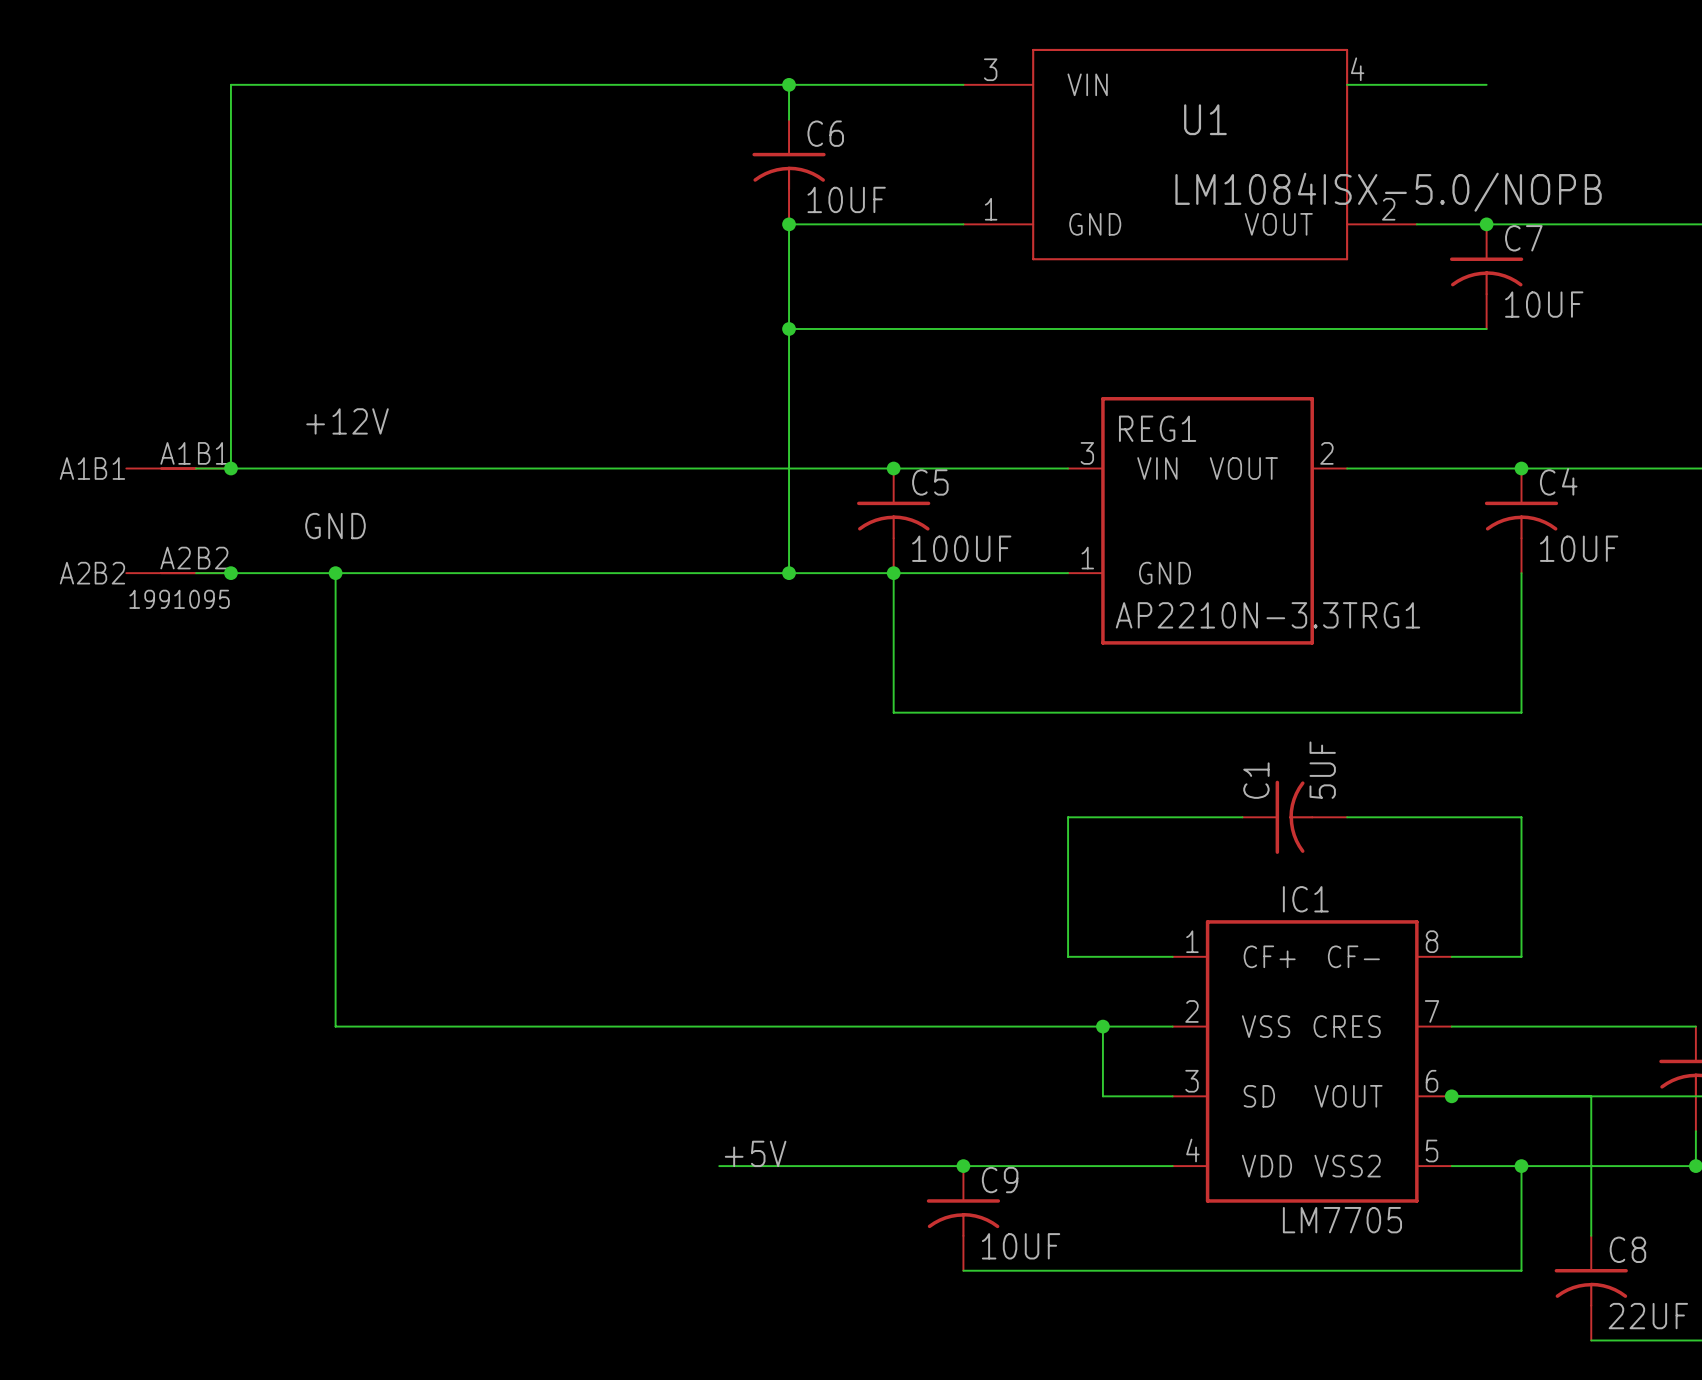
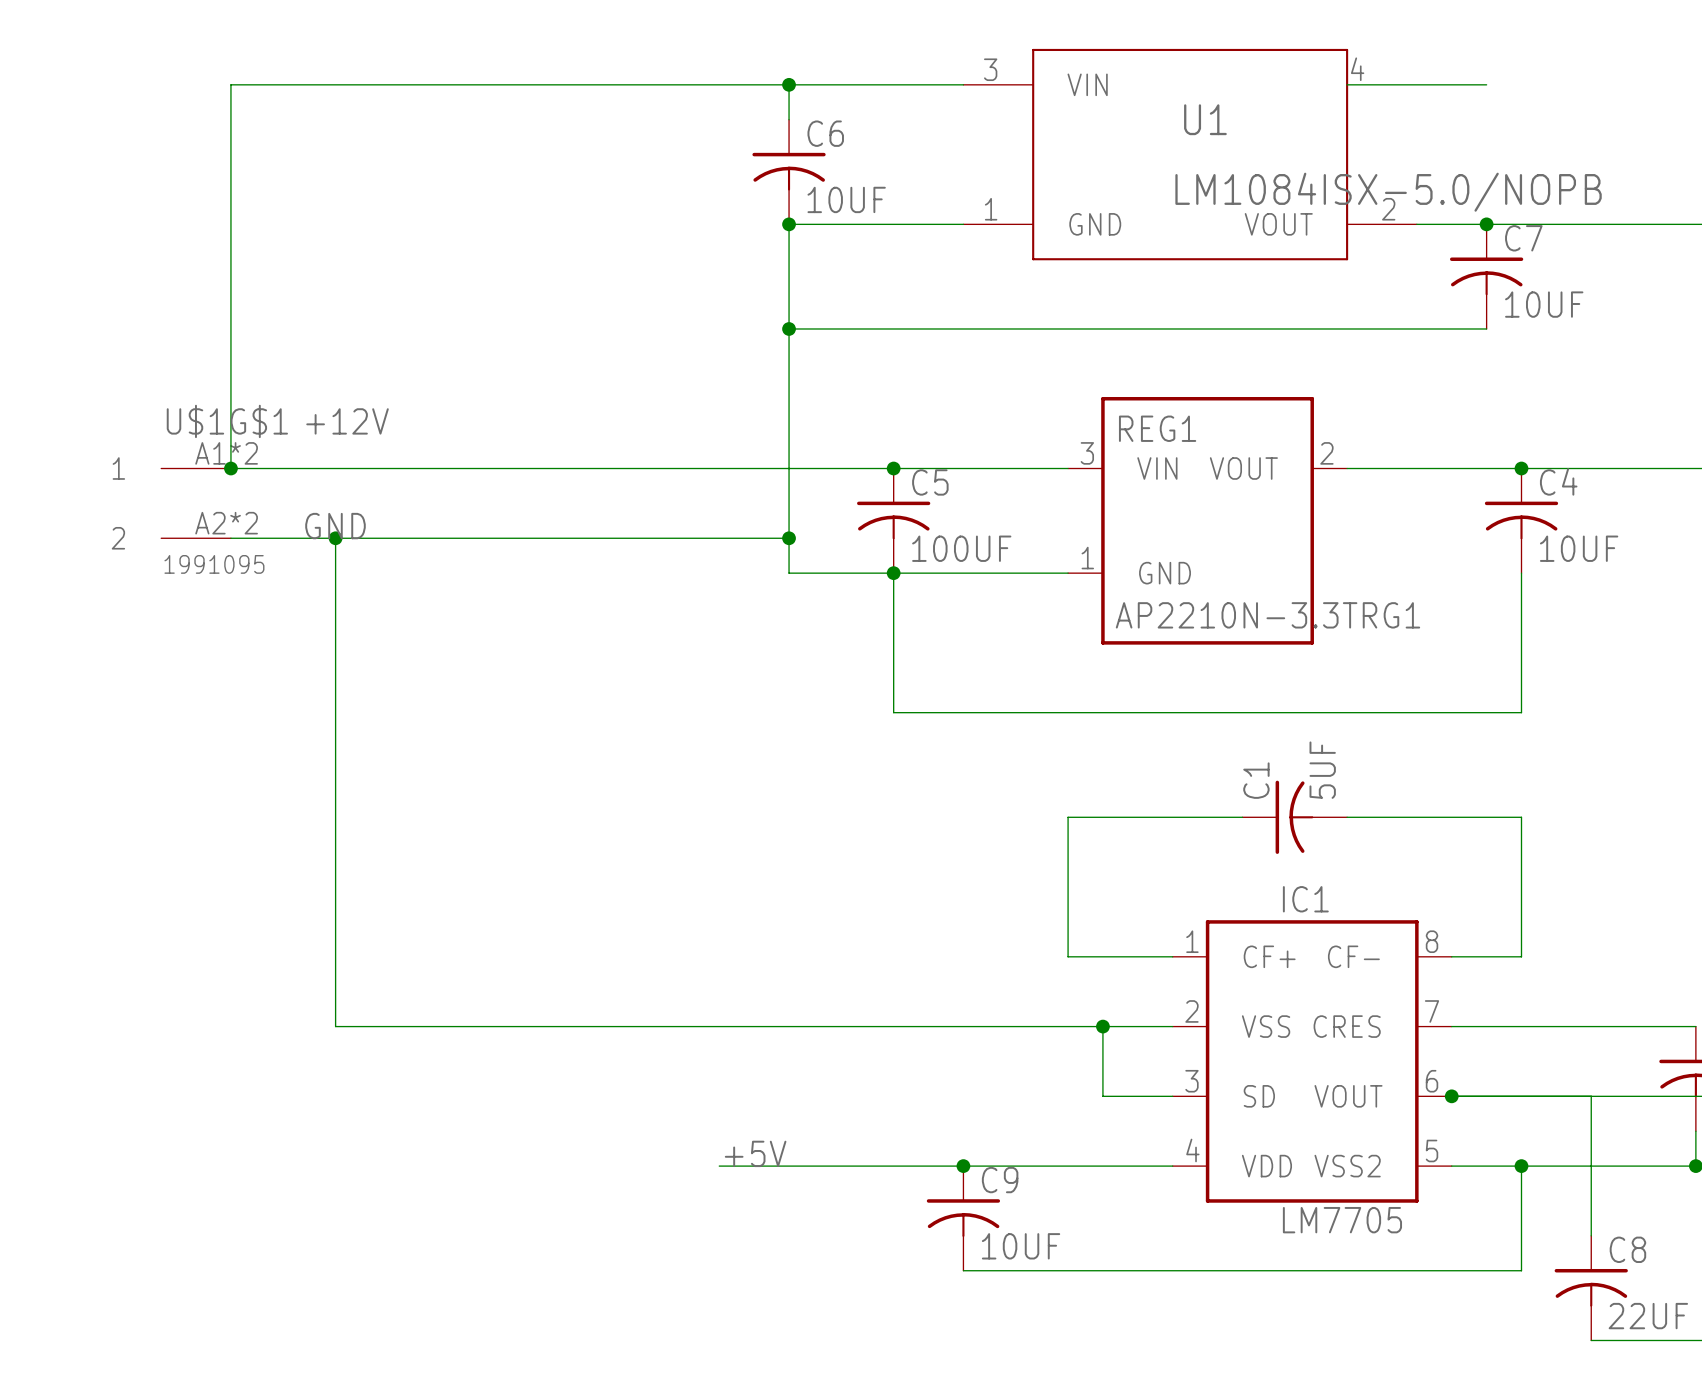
part: (178, 468) -> none
U$1G$1: none -> (196, 468)
part: none -> 1991095 (196, 538)
wire: none -> (230, 538) (789, 538)
wire: none -> (335, 538) (335, 573)
part: 1991095 (178, 573) -> none
wire: (196, 573) (789, 573) -> none
junction: (230, 573) -> none
junction position: (335, 573) -> (335, 538)
junction position: (789, 573) -> (789, 538)

